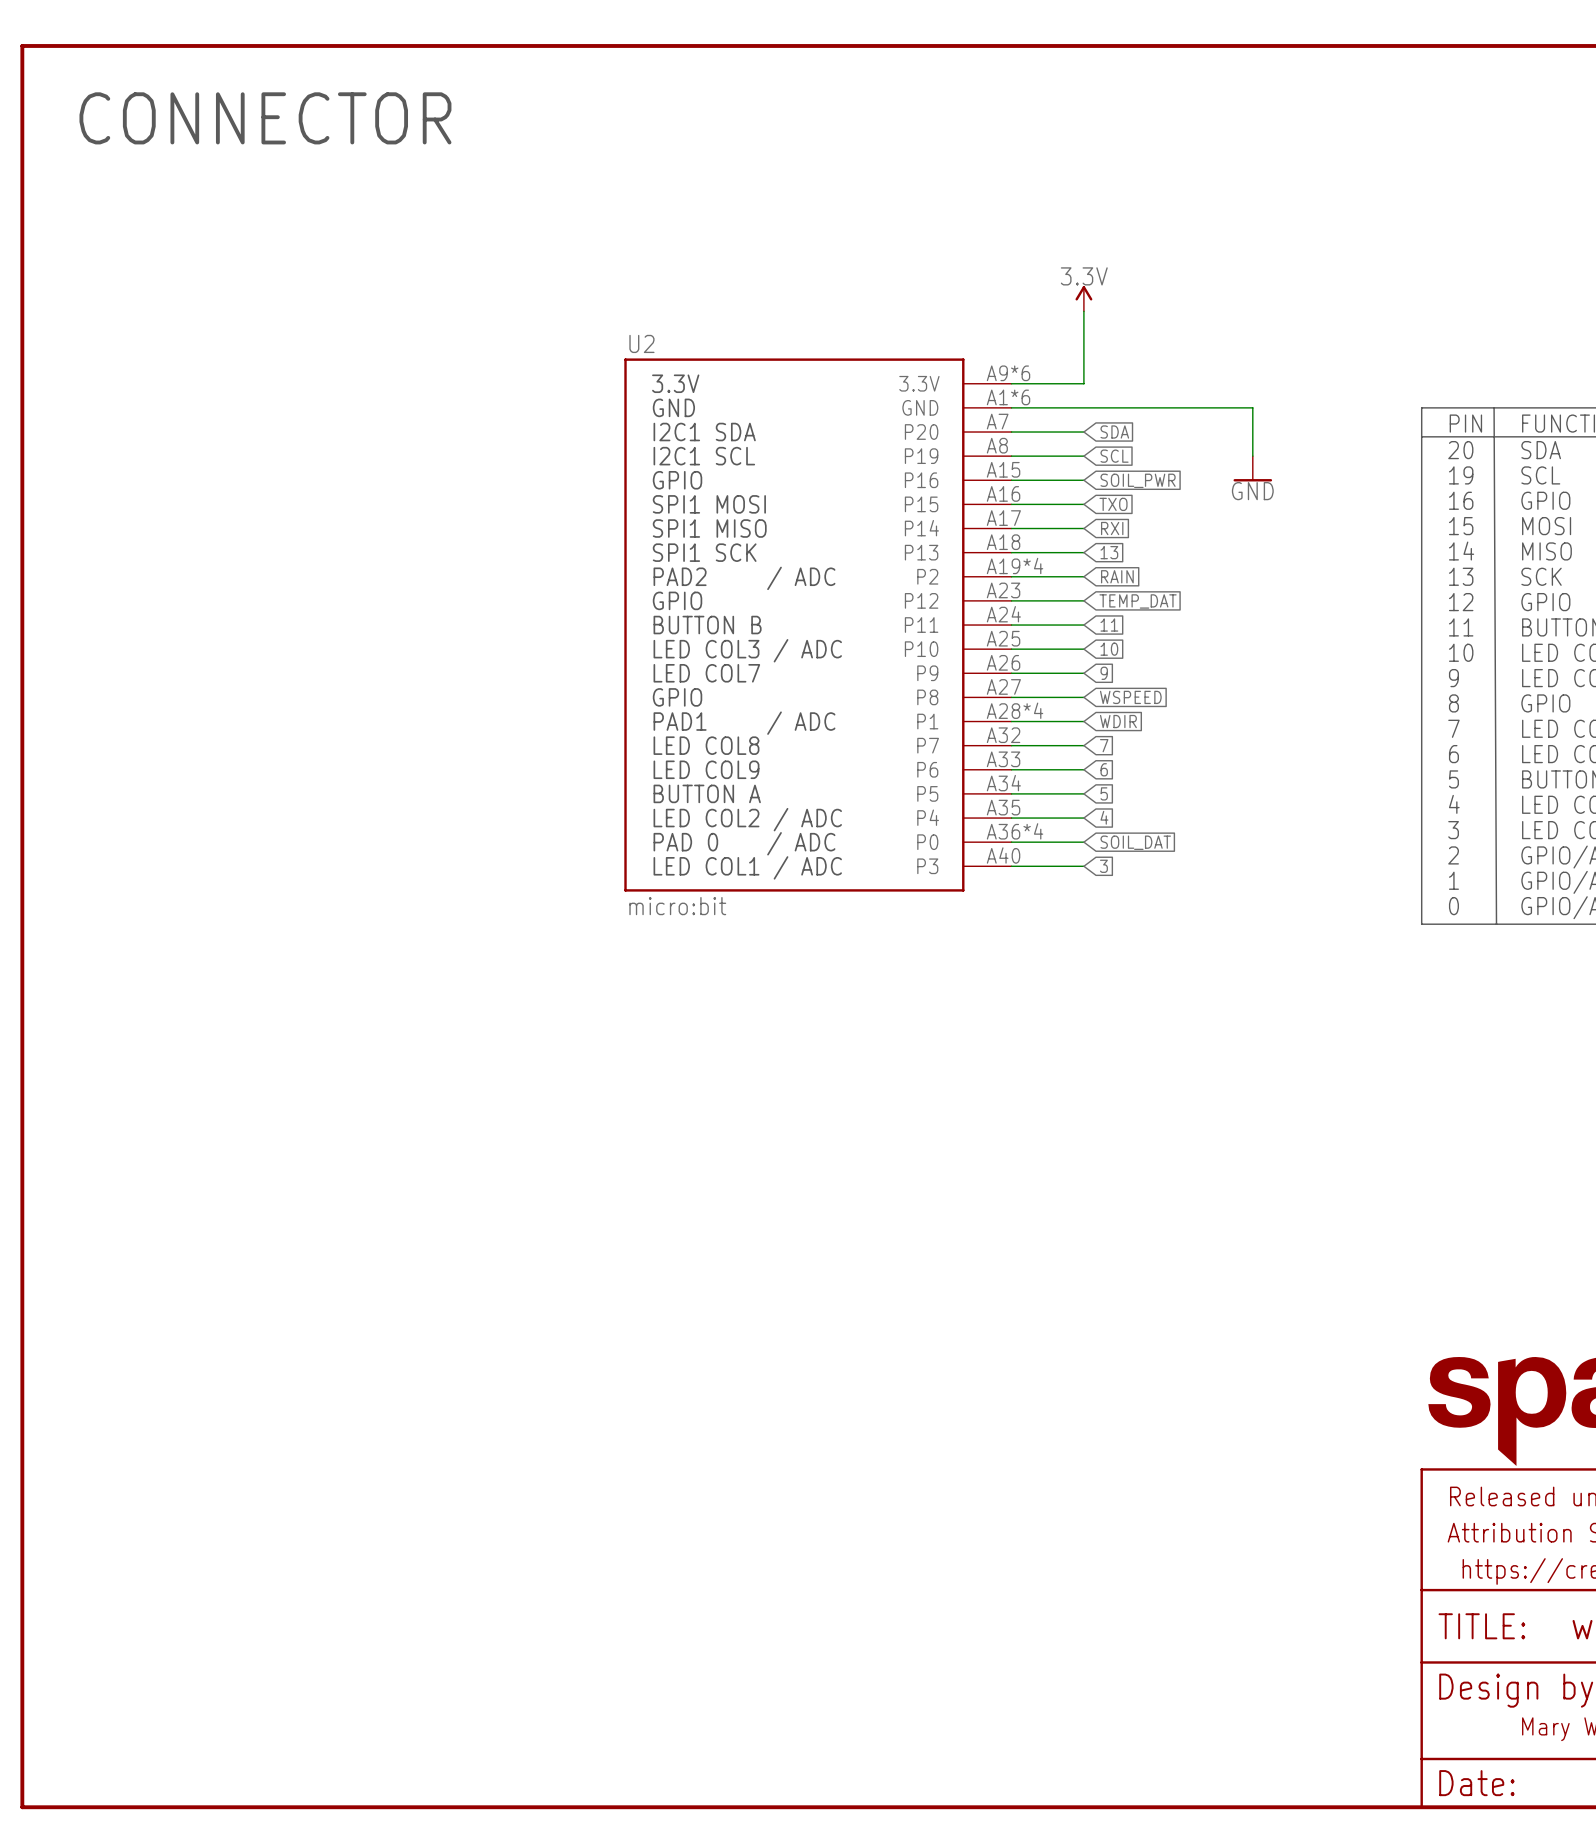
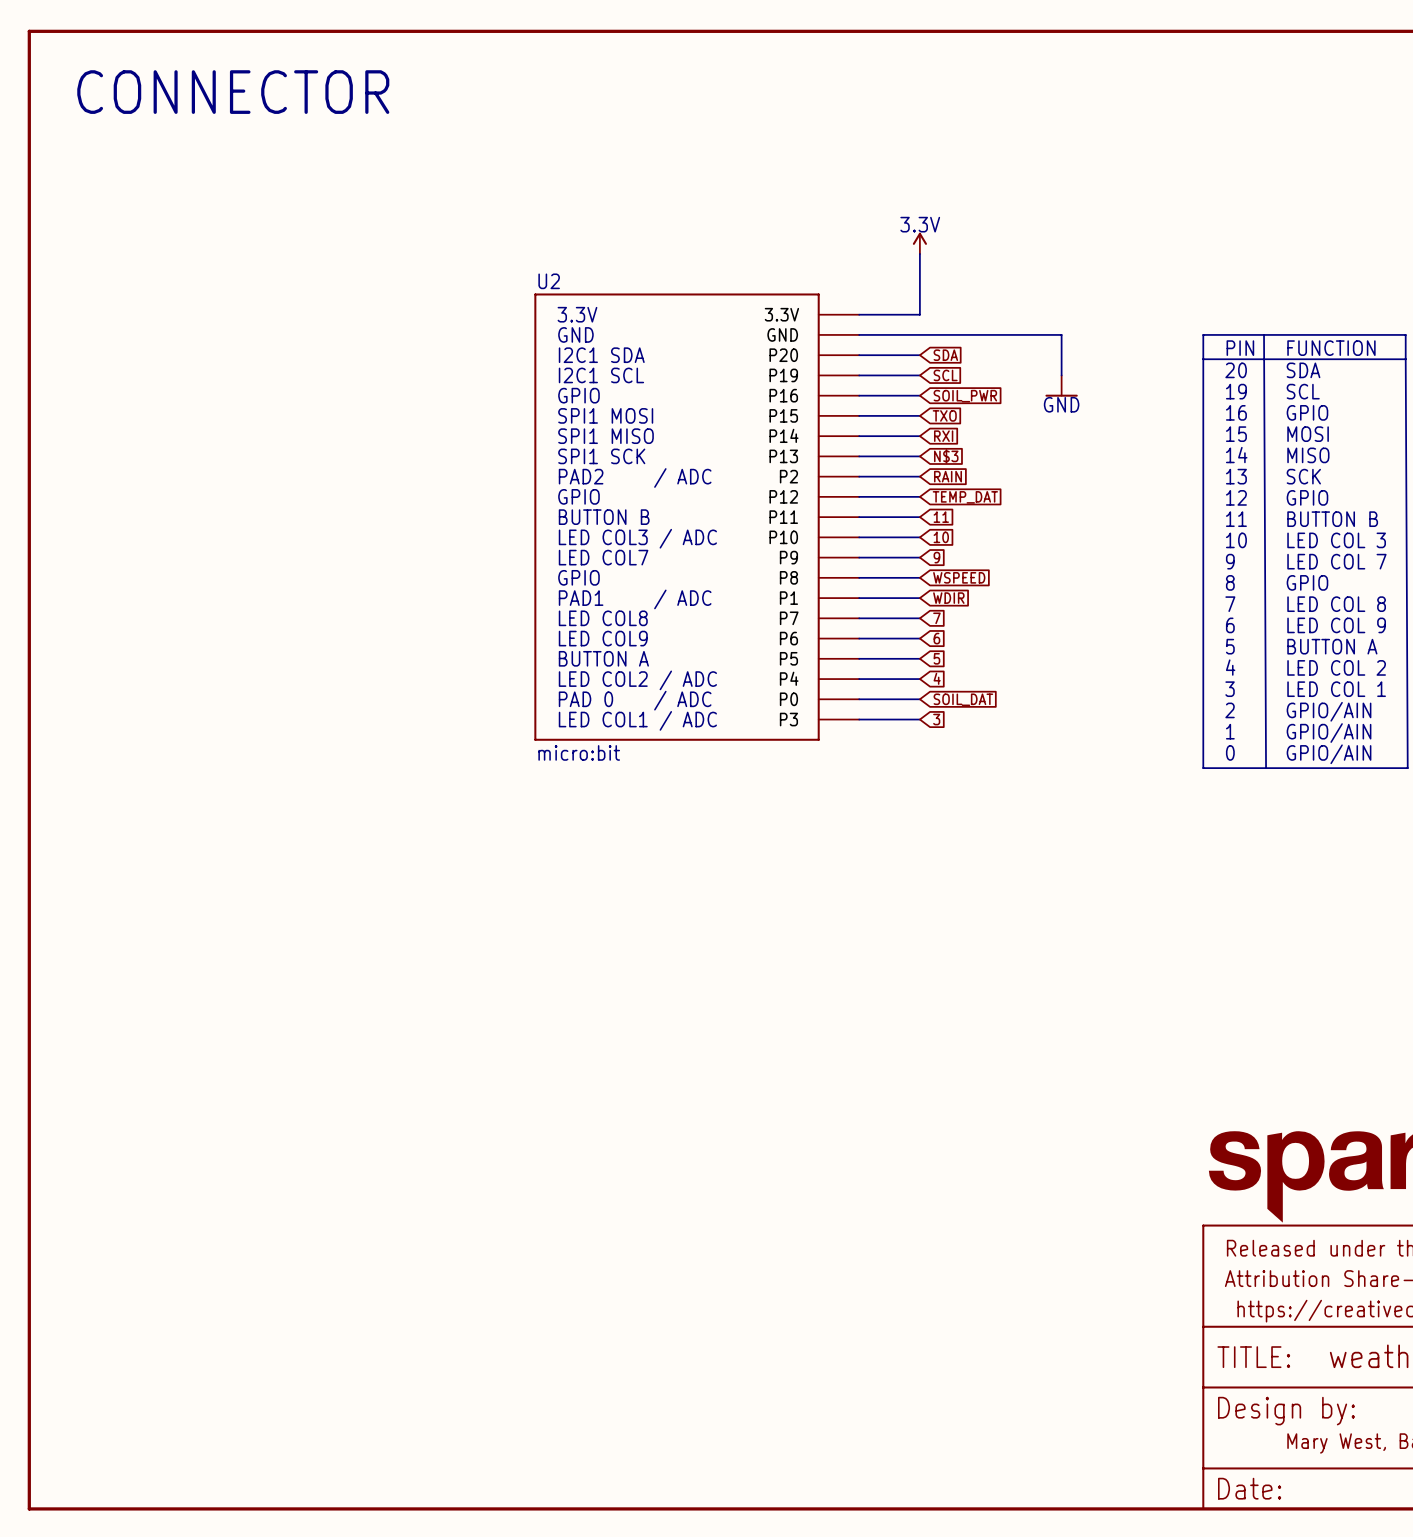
U2 symbol: [624, 358, 1012, 892] -> [534, 293, 860, 741]
global label: 13 (1109, 552) -> N$3 (946, 456)

